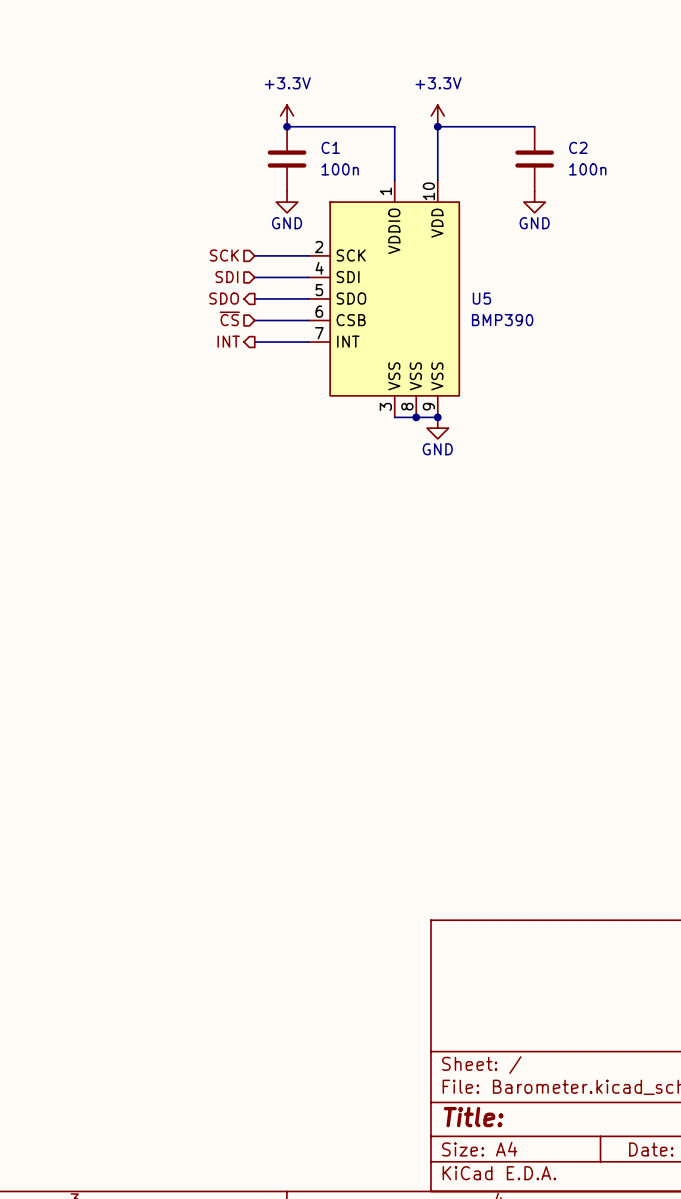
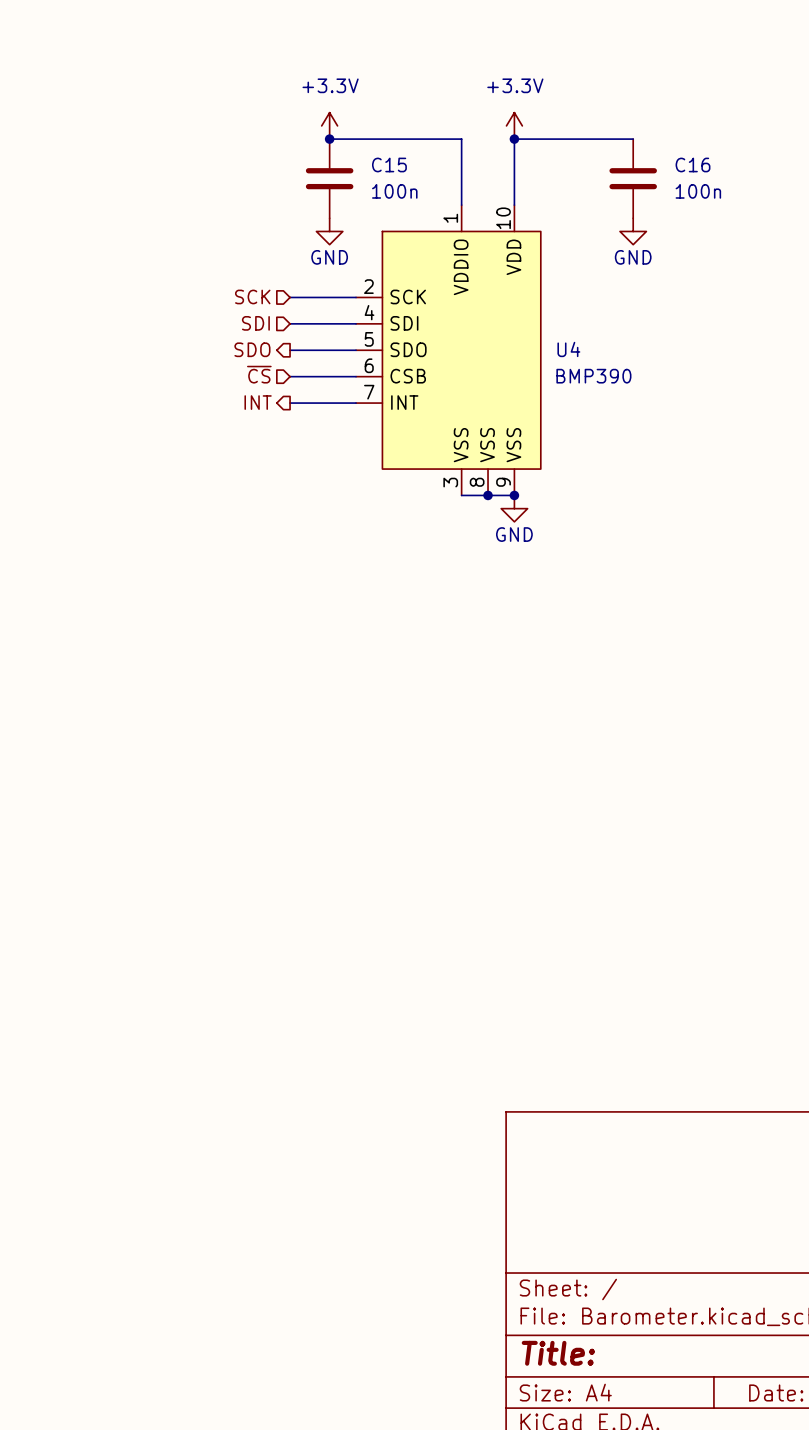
C1 name: C1 (330, 147) -> C15 (389, 164)
C2 name: C2 (578, 147) -> C16 (693, 164)
U5 name: U5 (481, 298) -> U4 (568, 349)

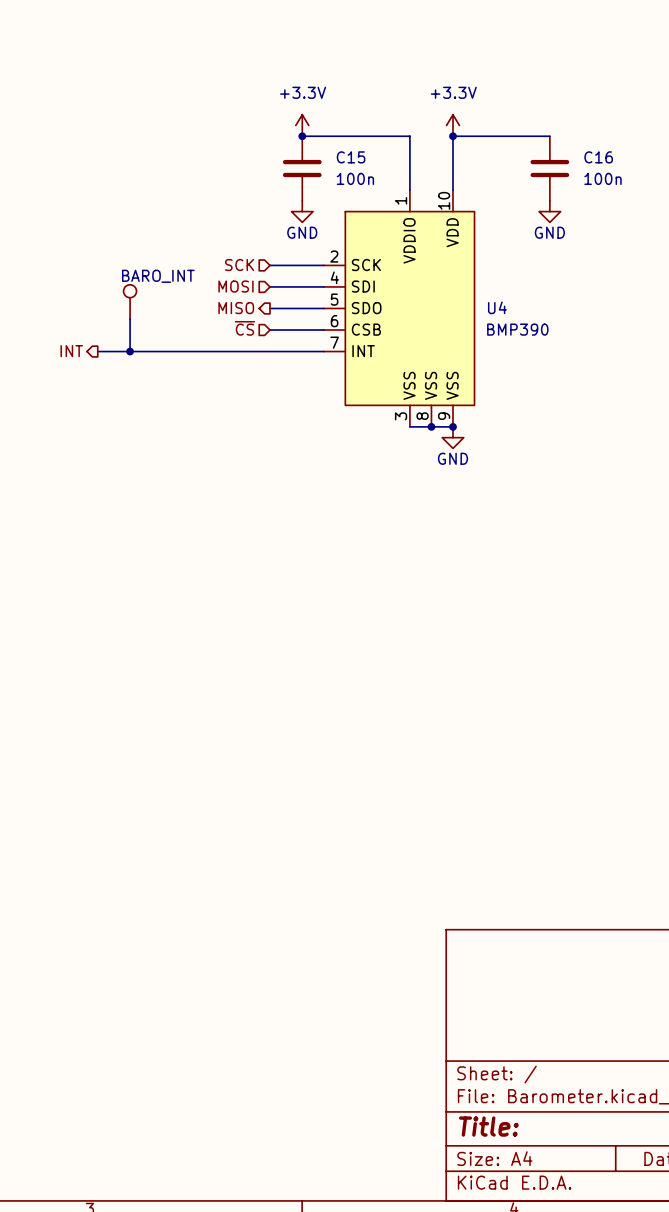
hierarchical label: SDI (255, 323) -> MOSI (235, 286)
part: none -> BARO_INT (130, 302)
hierarchical label: SDO (252, 349) -> MISO (236, 308)
wire: none -> (130, 319) (130, 351)
hierarchical label position: INT (258, 402) -> INT (71, 351)
wire: none -> (97, 351) (269, 351)
junction: none -> (130, 351)

